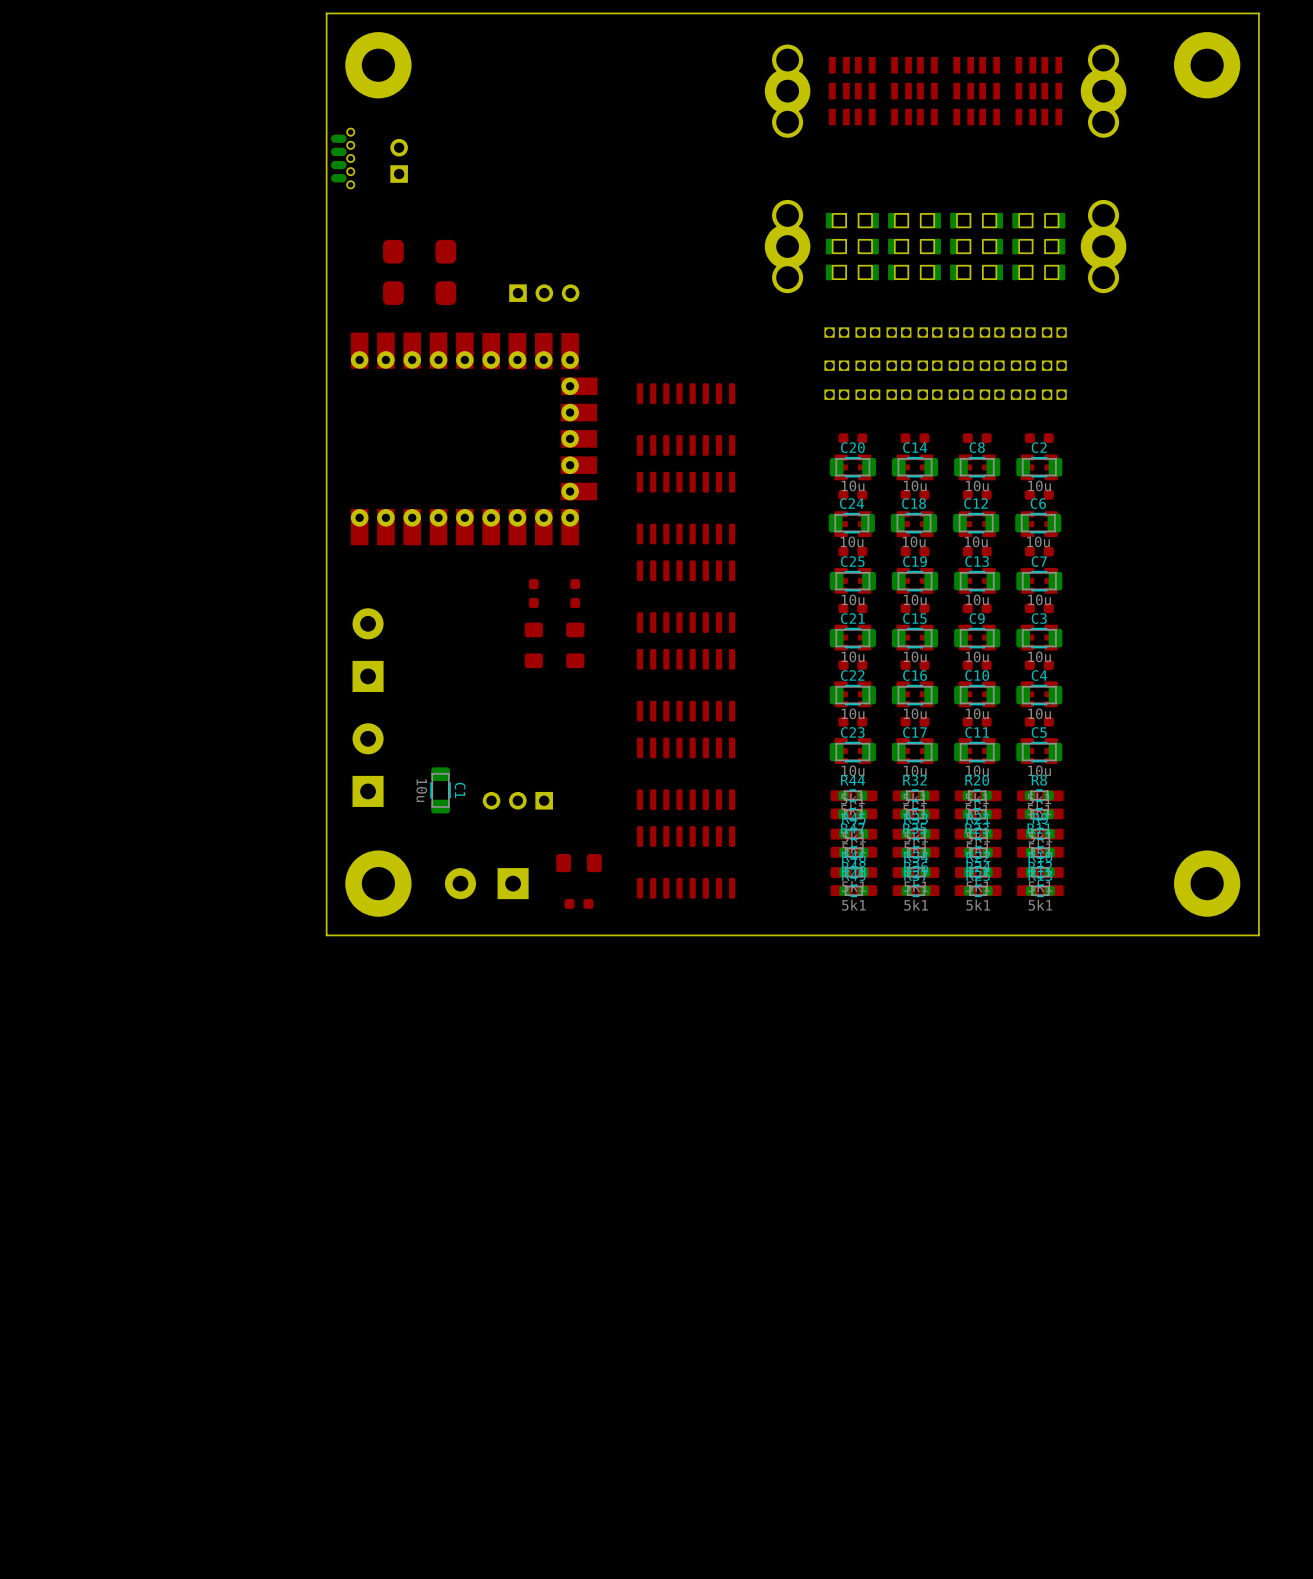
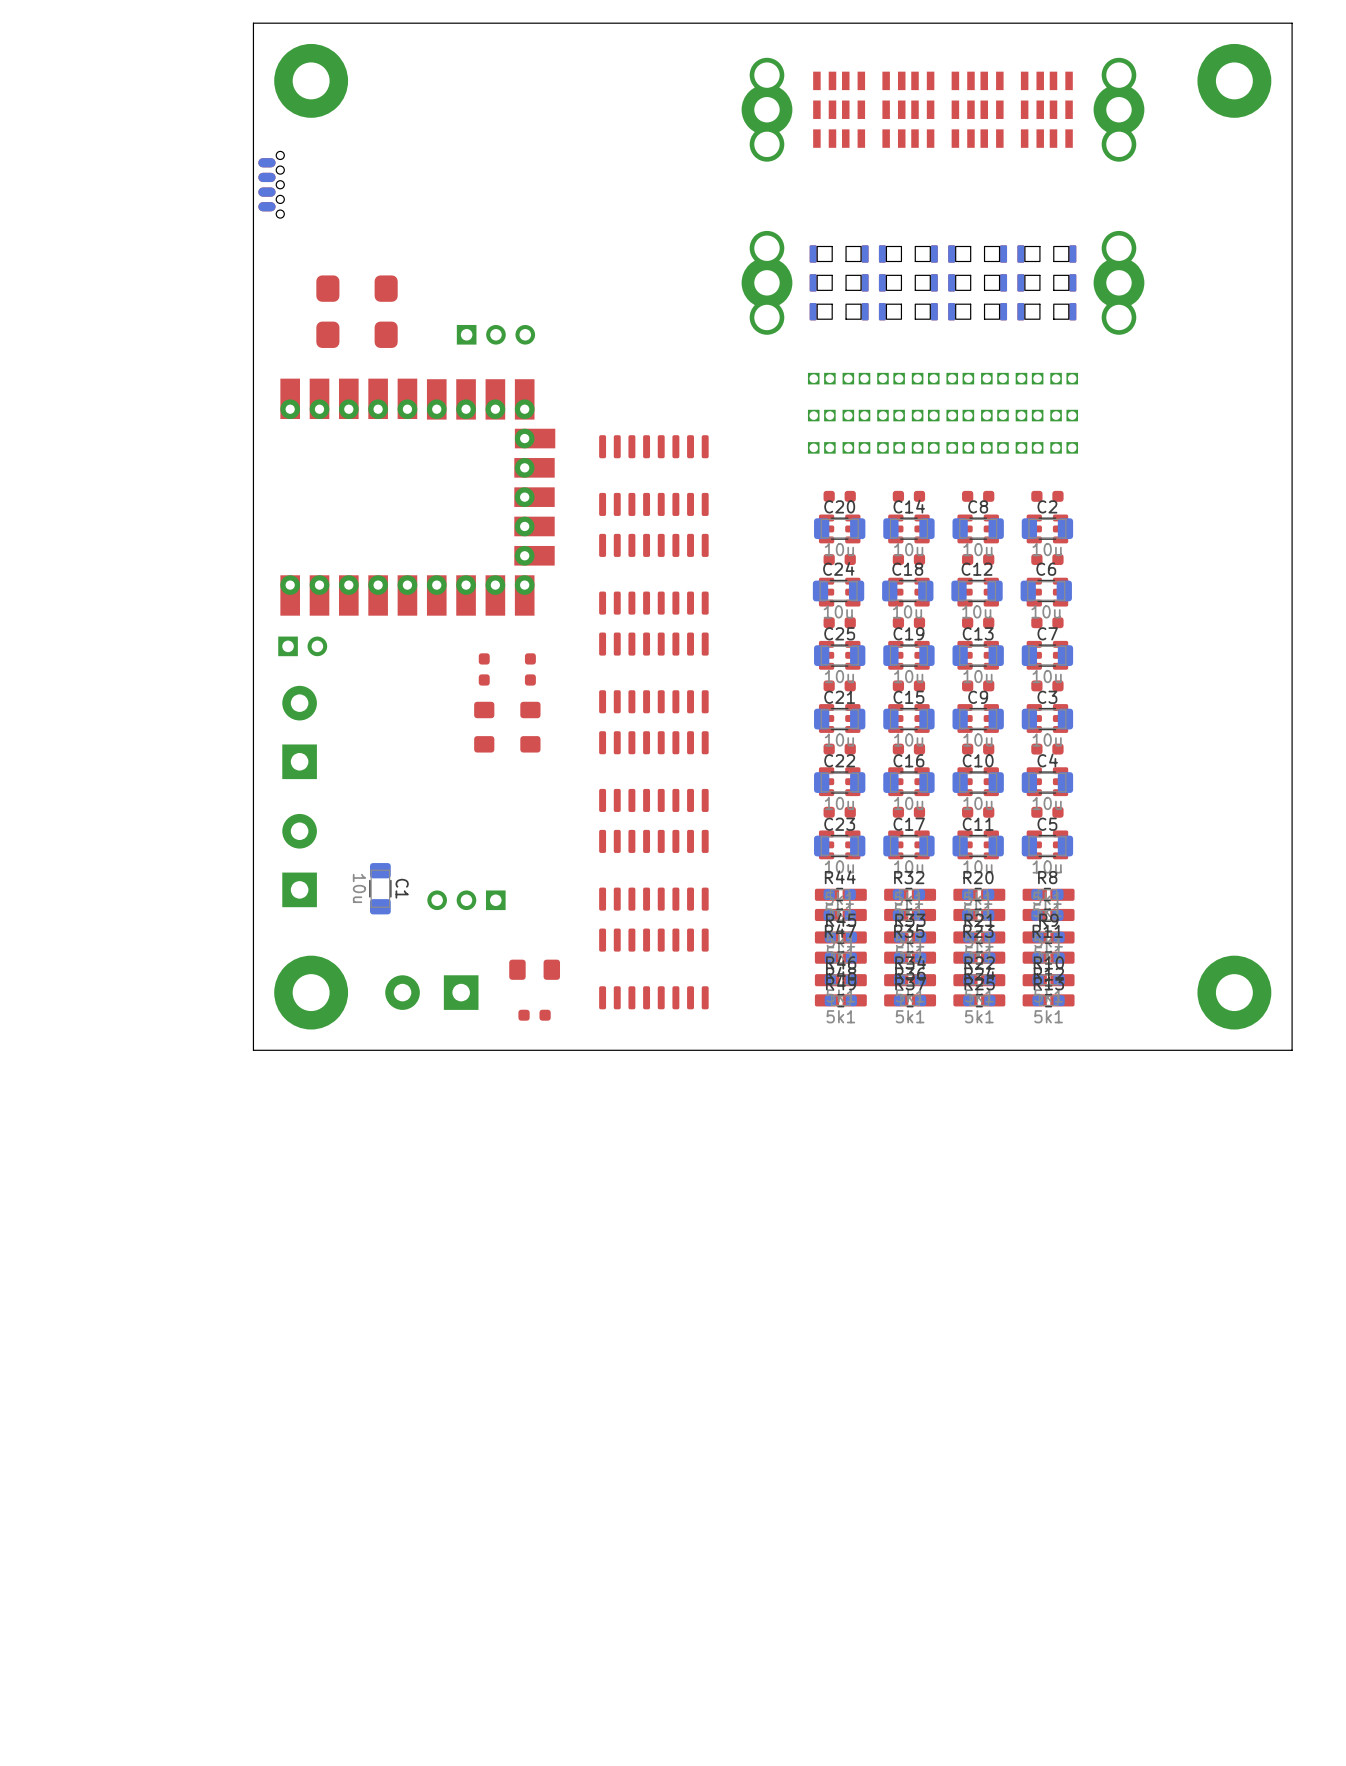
part: (399, 160) -> none
part: none -> (302, 646)

